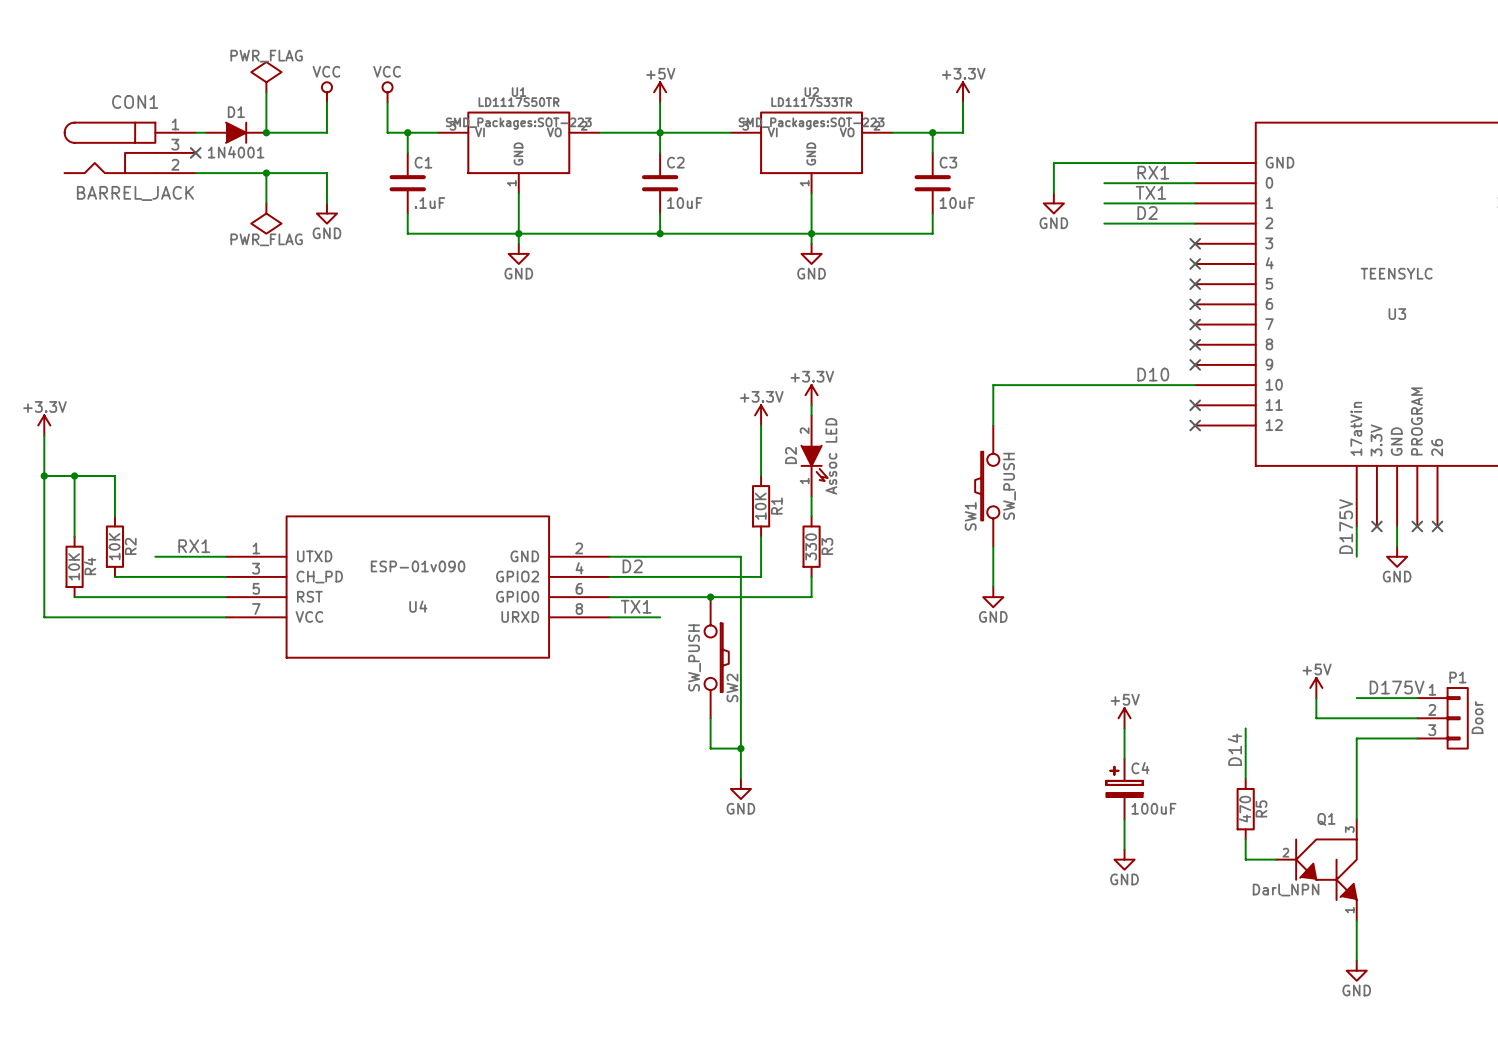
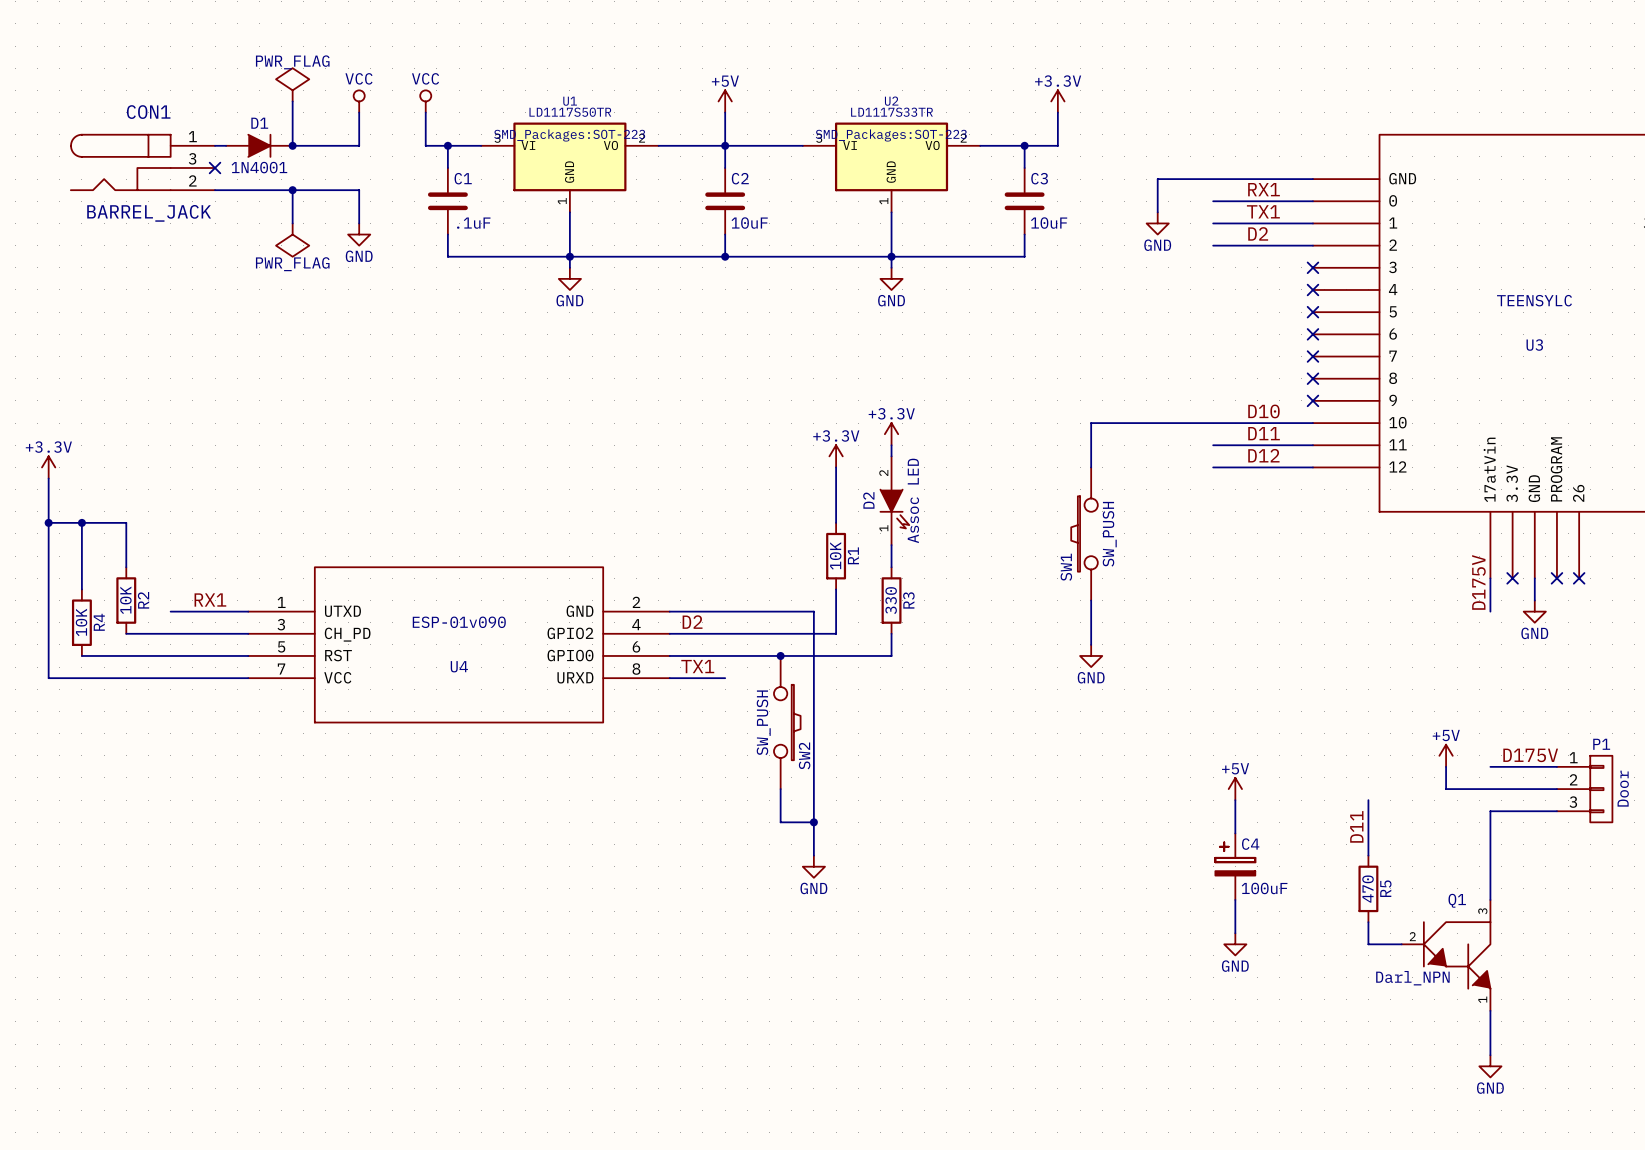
label: none -> D11 (1264, 433)
wire: none -> (1213, 445) (1312, 445)
no-connect mark: (1195, 405) -> none
label: none -> D12 (1263, 455)
wire: none -> (1213, 467) (1312, 467)
no-connect mark: (1195, 425) -> none
label: D14 (1234, 749) -> D11 (1356, 826)

